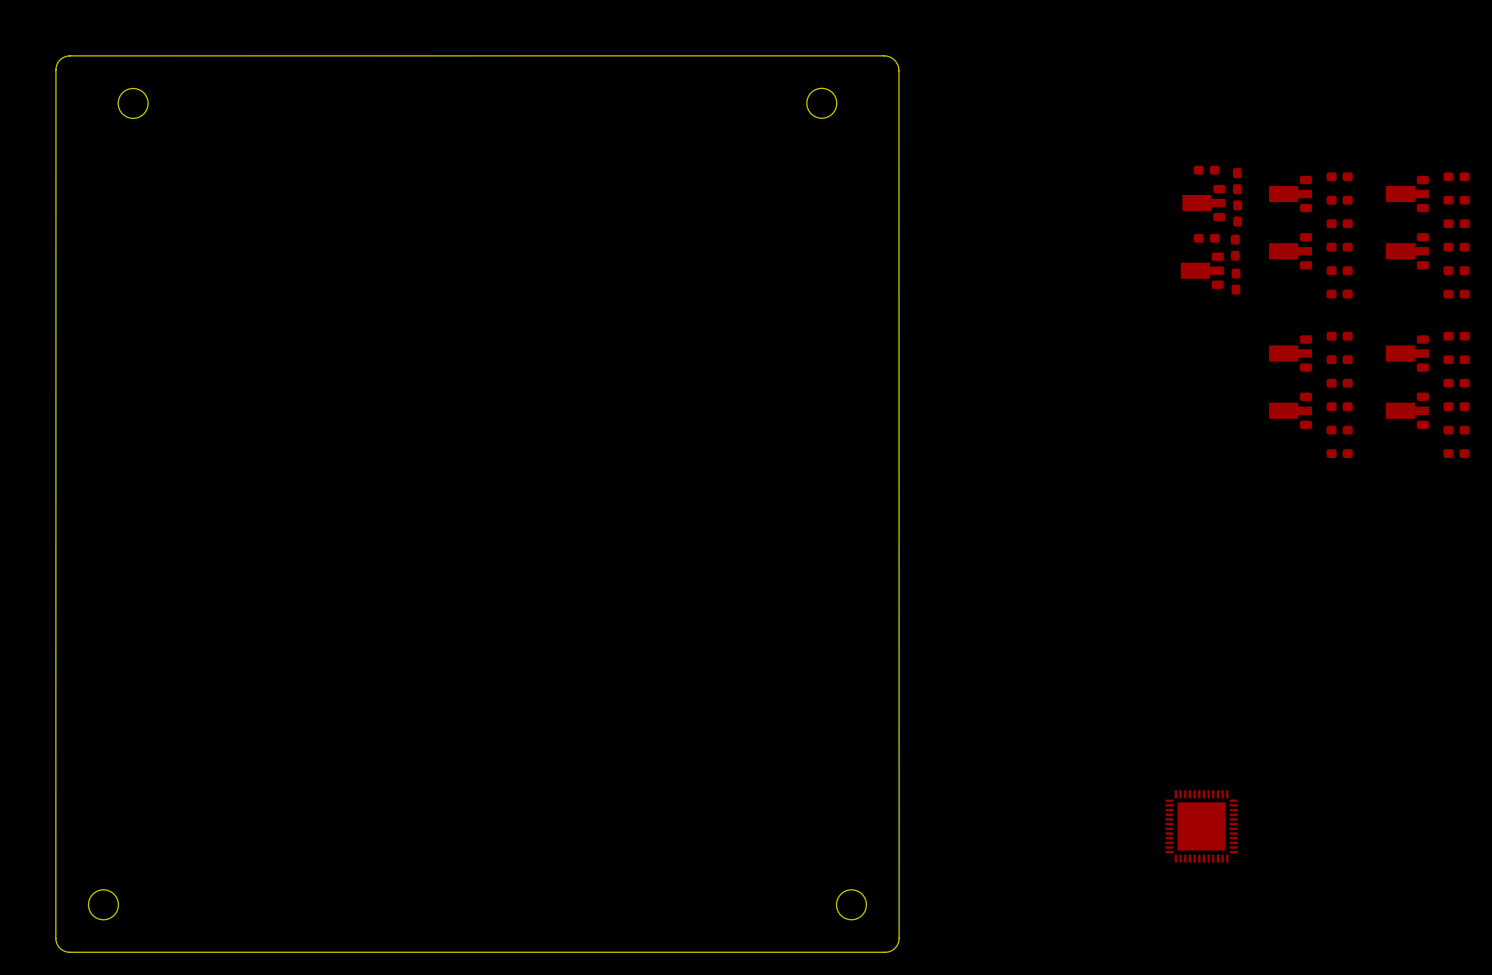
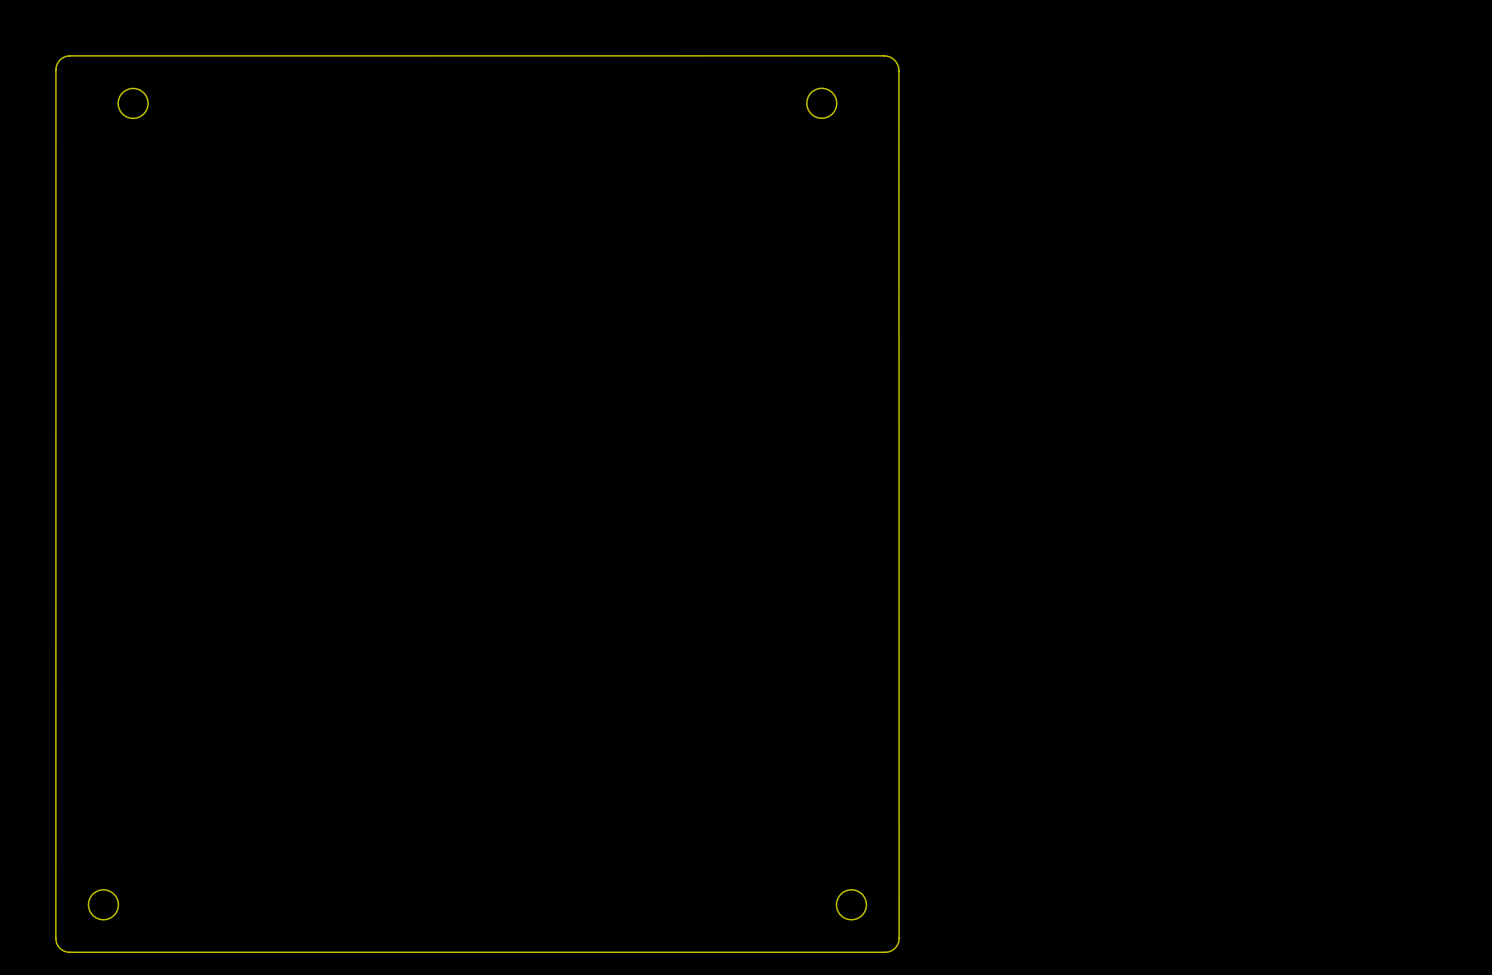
part: (1206, 170) -> none
part: (1339, 176) -> none
part: (1456, 176) -> none
part: (1237, 181) -> none
part: (1290, 194) -> none
part: (1407, 194) -> none
part: (1339, 200) -> none
part: (1456, 200) -> none
part: (1203, 203) -> none
part: (1237, 213) -> none
part: (1339, 223) -> none
part: (1456, 223) -> none
part: (1206, 238) -> none
part: (1235, 247) -> none
part: (1339, 247) -> none
part: (1456, 247) -> none
part: (1290, 251) -> none
part: (1407, 251) -> none
part: (1202, 270) -> none
part: (1339, 270) -> none
part: (1456, 270) -> none
part: (1235, 281) -> none
part: (1339, 294) -> none
part: (1456, 294) -> none
part: (1339, 336) -> none
part: (1456, 336) -> none
part: (1290, 353) -> none
part: (1407, 353) -> none
part: (1339, 359) -> none
part: (1456, 359) -> none
part: (1339, 383) -> none
part: (1456, 383) -> none
part: (1339, 406) -> none
part: (1456, 406) -> none
part: (1290, 410) -> none
part: (1407, 410) -> none
part: (1339, 430) -> none
part: (1456, 430) -> none
part: (1339, 453) -> none
part: (1456, 453) -> none
part: (1201, 826) -> none

